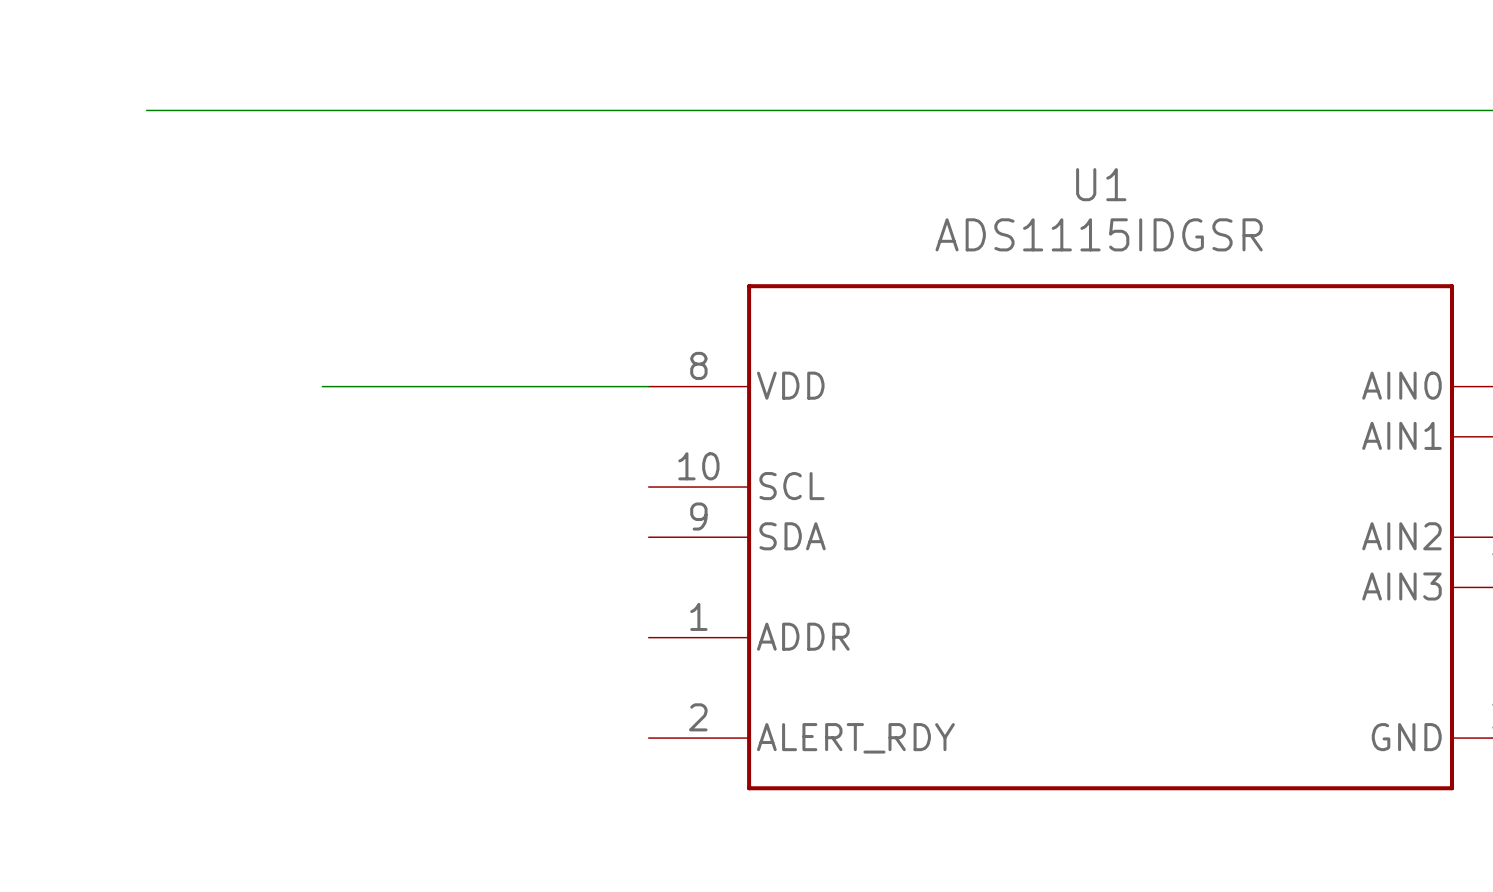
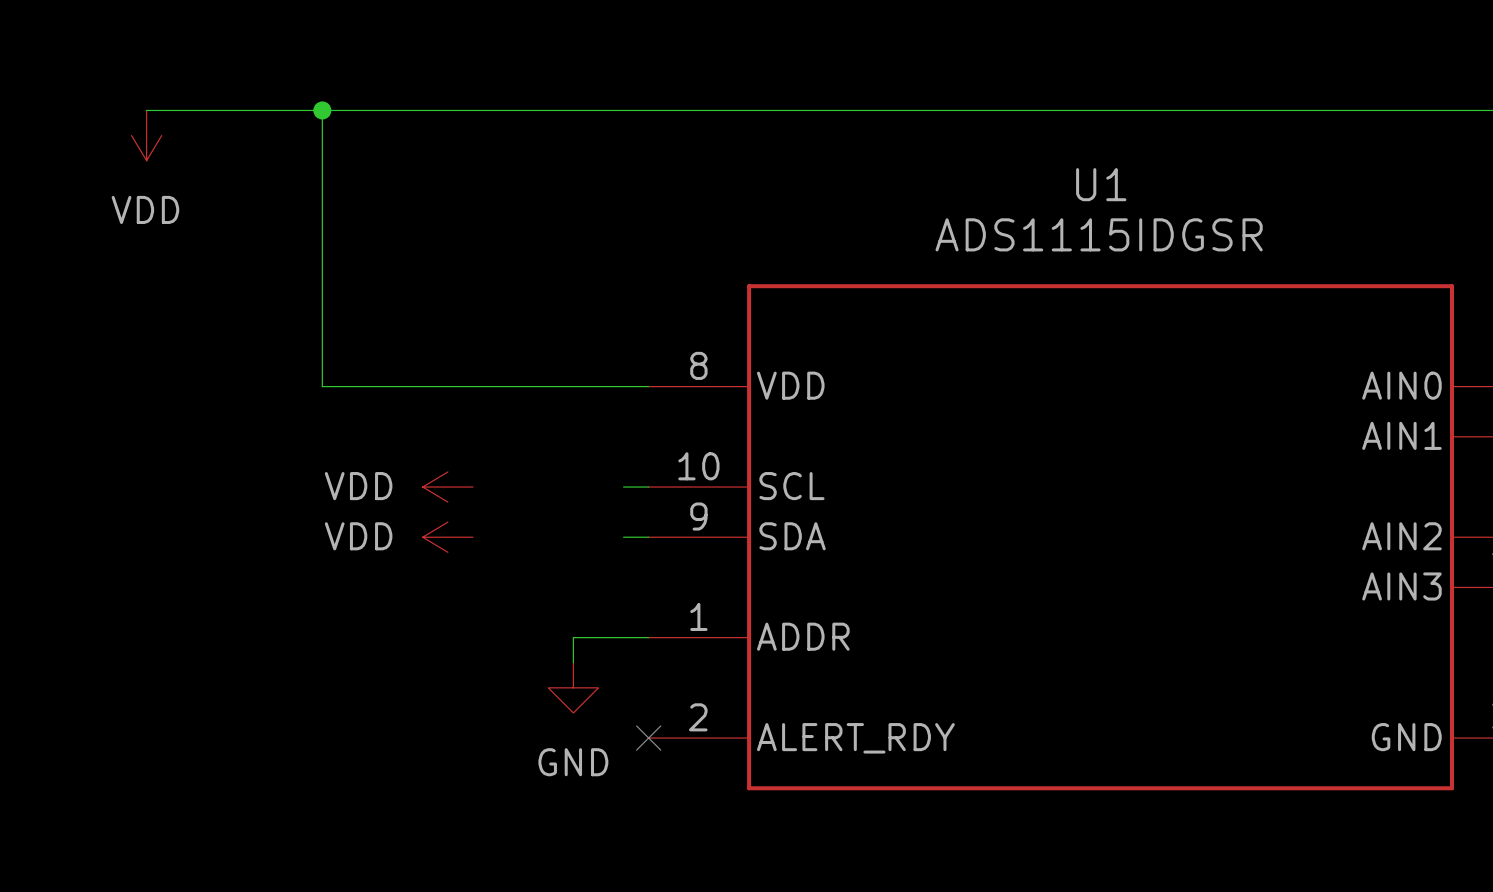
wire: none -> (322, 110) (322, 386)
junction: none -> (322, 110)
power symbol: none -> VDD (146, 135)
power symbol: none -> VDD (447, 487)
wire: none -> (623, 487) (648, 487)
power symbol: none -> VDD (447, 537)
wire: none -> (623, 537) (648, 537)
wire: none -> (648, 637) (573, 637) (573, 662)
power symbol: none -> GND (573, 687)
no-connect mark: none -> (648, 738)

